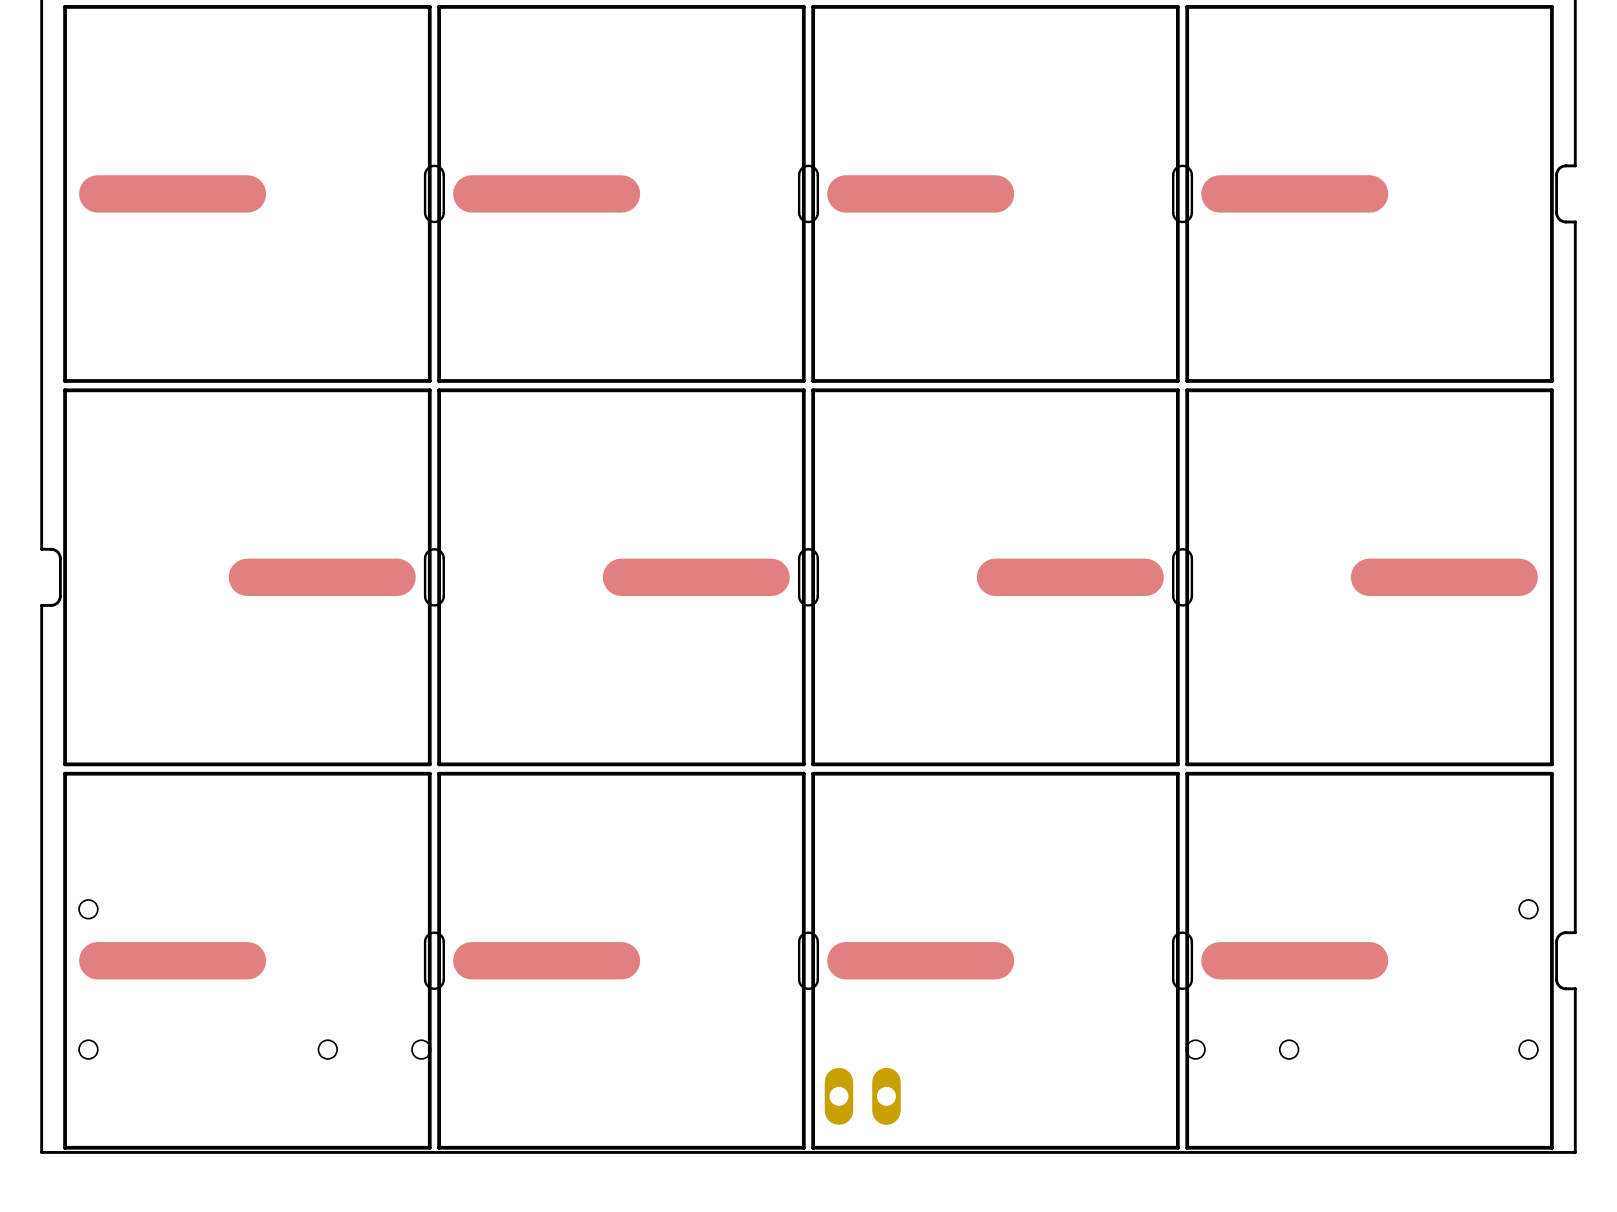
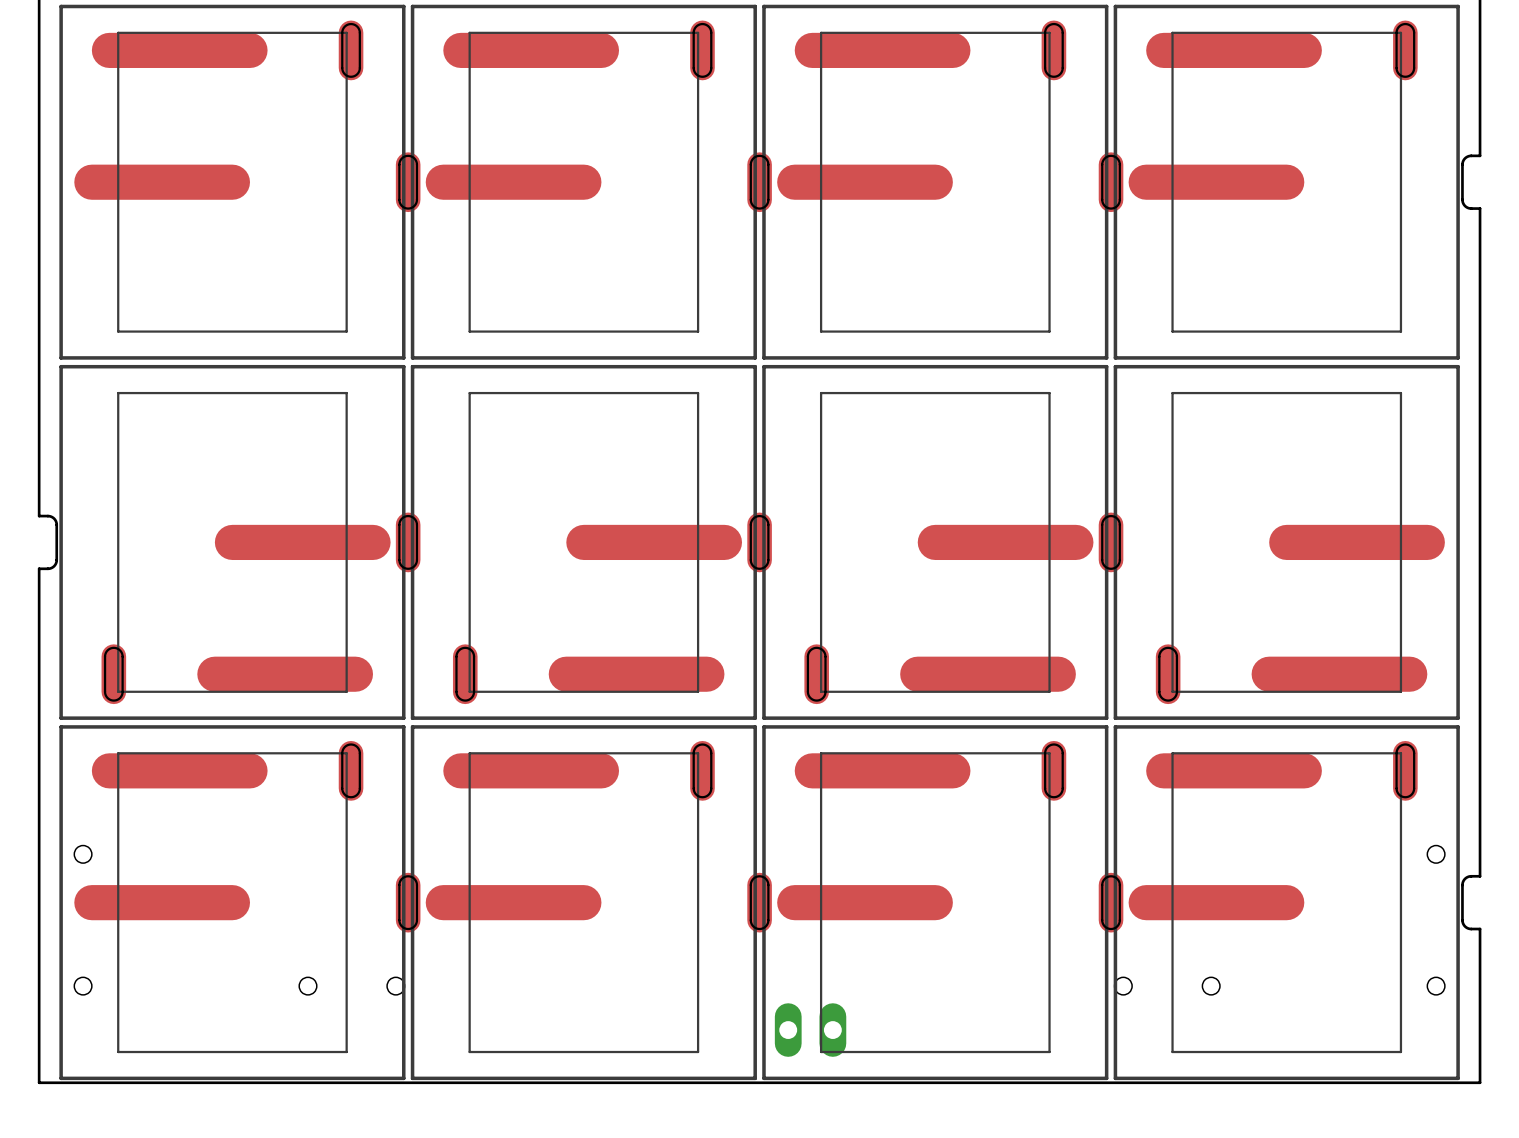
part footprint: [63, 5, 445, 383] -> [59, 4, 421, 360]
part footprint: [437, 5, 820, 383] -> [410, 4, 772, 360]
part footprint: [811, 5, 1194, 383] -> [762, 4, 1124, 360]
part footprint: [1185, 5, 1554, 383] -> [1113, 4, 1460, 360]
part footprint: [63, 388, 432, 767] -> [59, 364, 406, 720]
part footprint: [423, 388, 806, 767] -> [395, 364, 757, 720]
part footprint: [797, 388, 1180, 767] -> [747, 364, 1109, 720]
part footprint: [1171, 388, 1554, 767] -> [1098, 364, 1460, 720]
part footprint: [63, 771, 445, 1150] -> [59, 725, 421, 1081]
part footprint: [437, 771, 820, 1150] -> [410, 725, 772, 1081]
part footprint: [811, 771, 1194, 1150] -> [762, 725, 1124, 1081]
part footprint: [1185, 771, 1554, 1150] -> [1113, 725, 1460, 1081]

